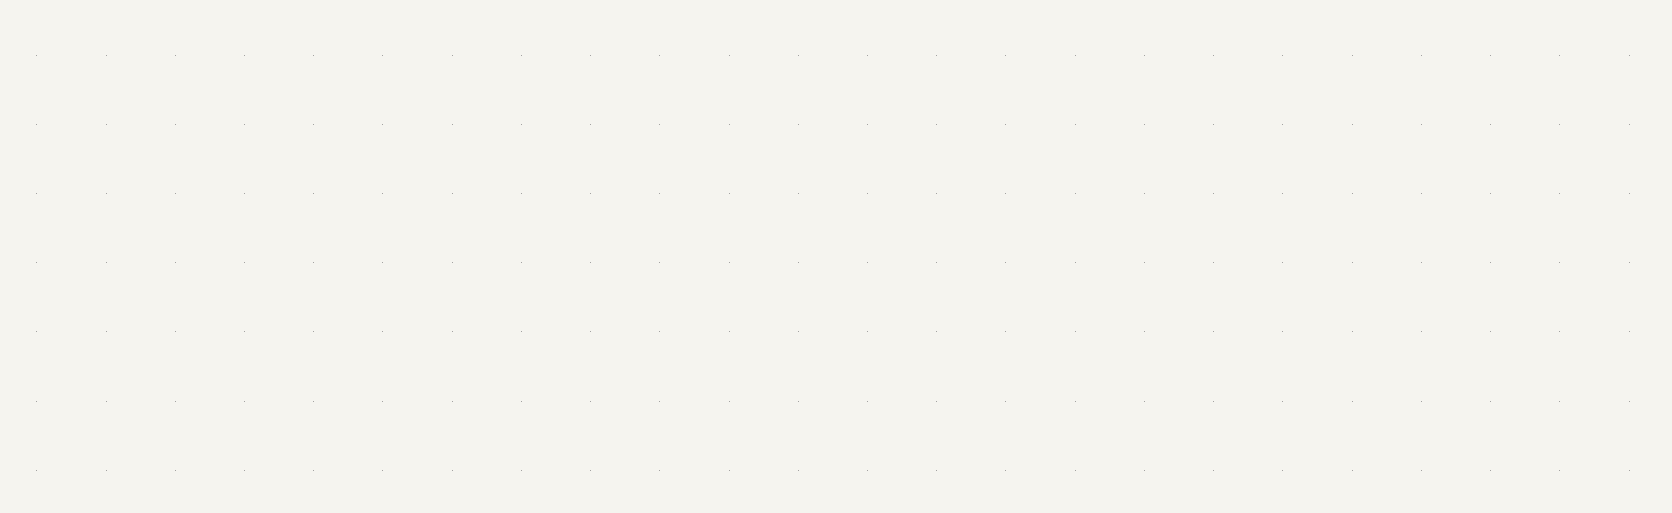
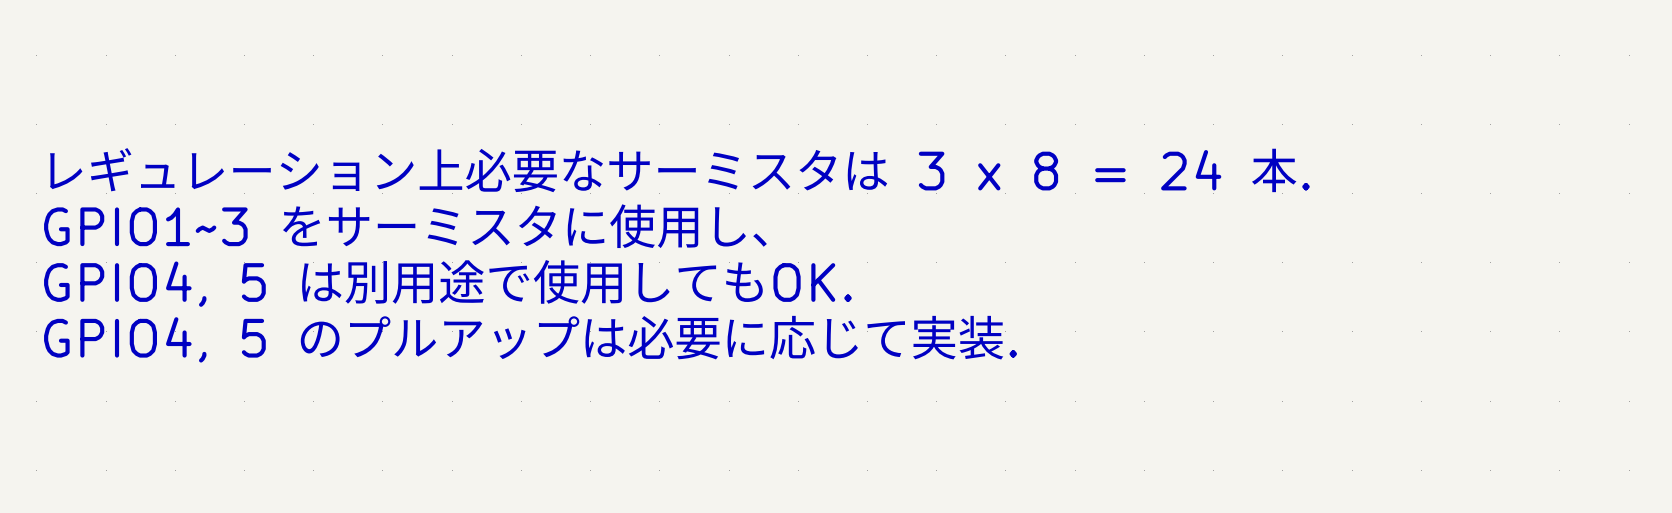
text: none -> レギュレーション上必要なサーミスタは 3 x 8 = 24 本. (678, 170)
text: none -> GPIO1~3 をサーミスタに使用し、 (406, 226)
text: none -> GPIO4, 5 は別用途で使用してもOK. (447, 282)
text: none -> GPIO4, 5 のプルアップは必要に応じて実装. (530, 338)

